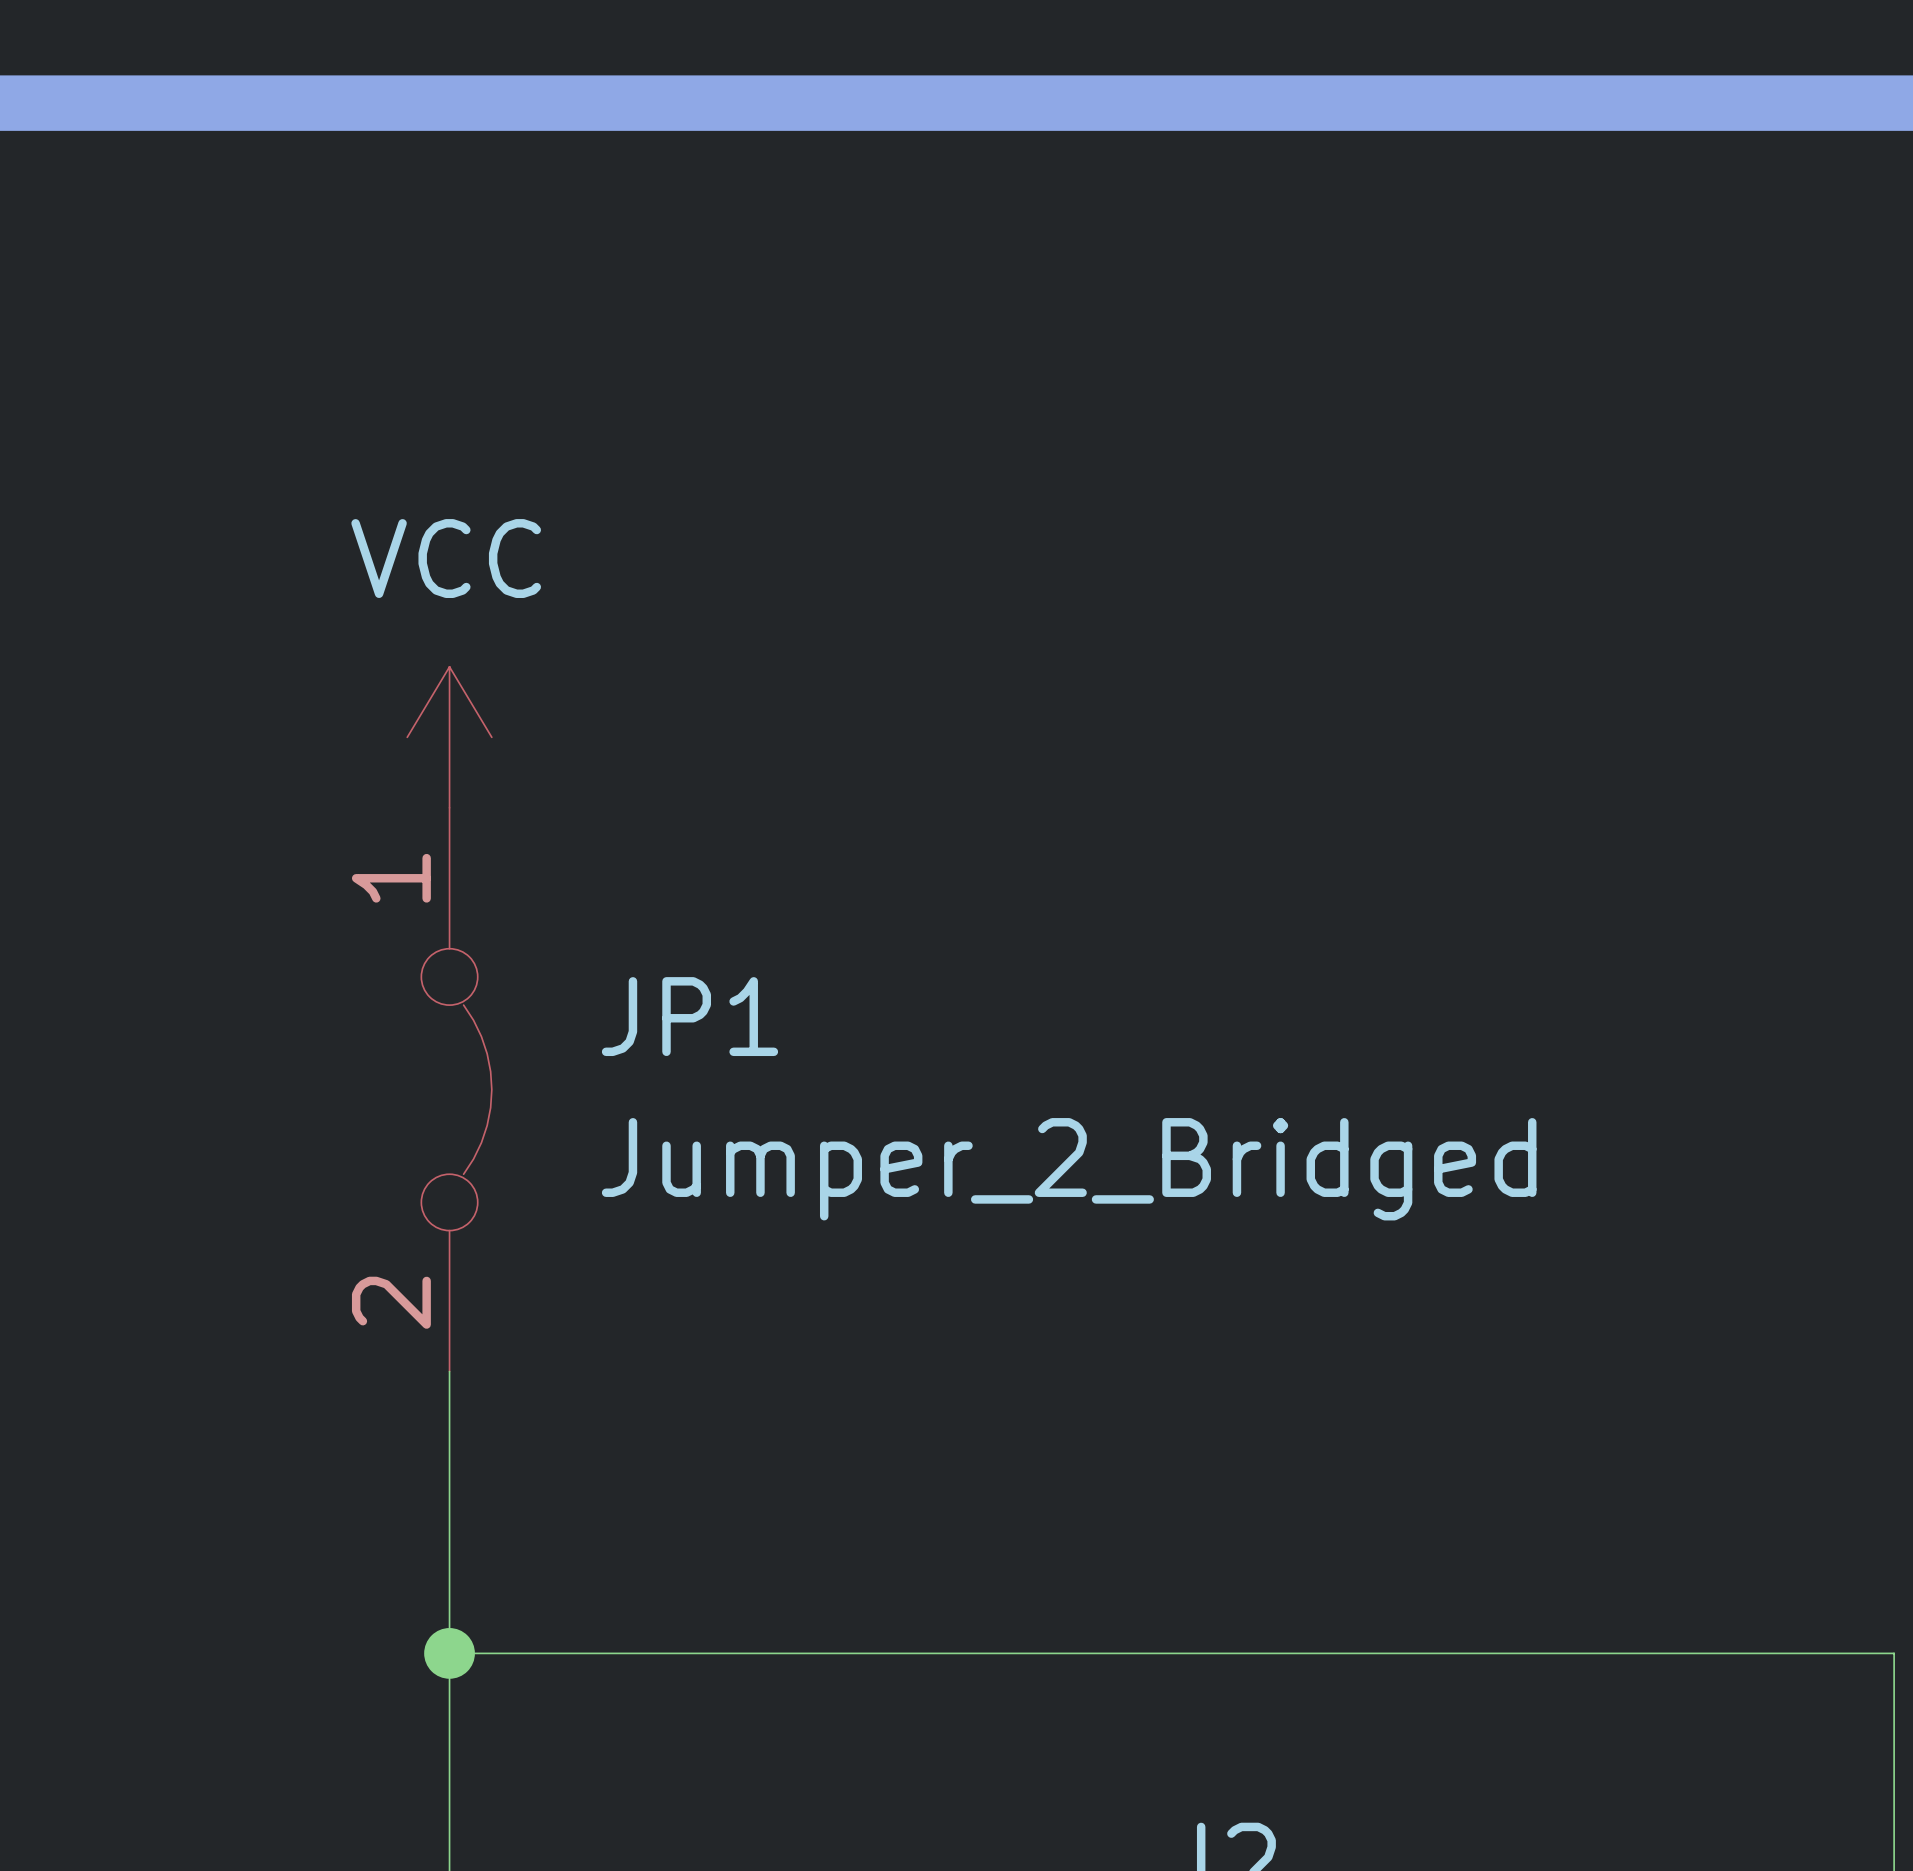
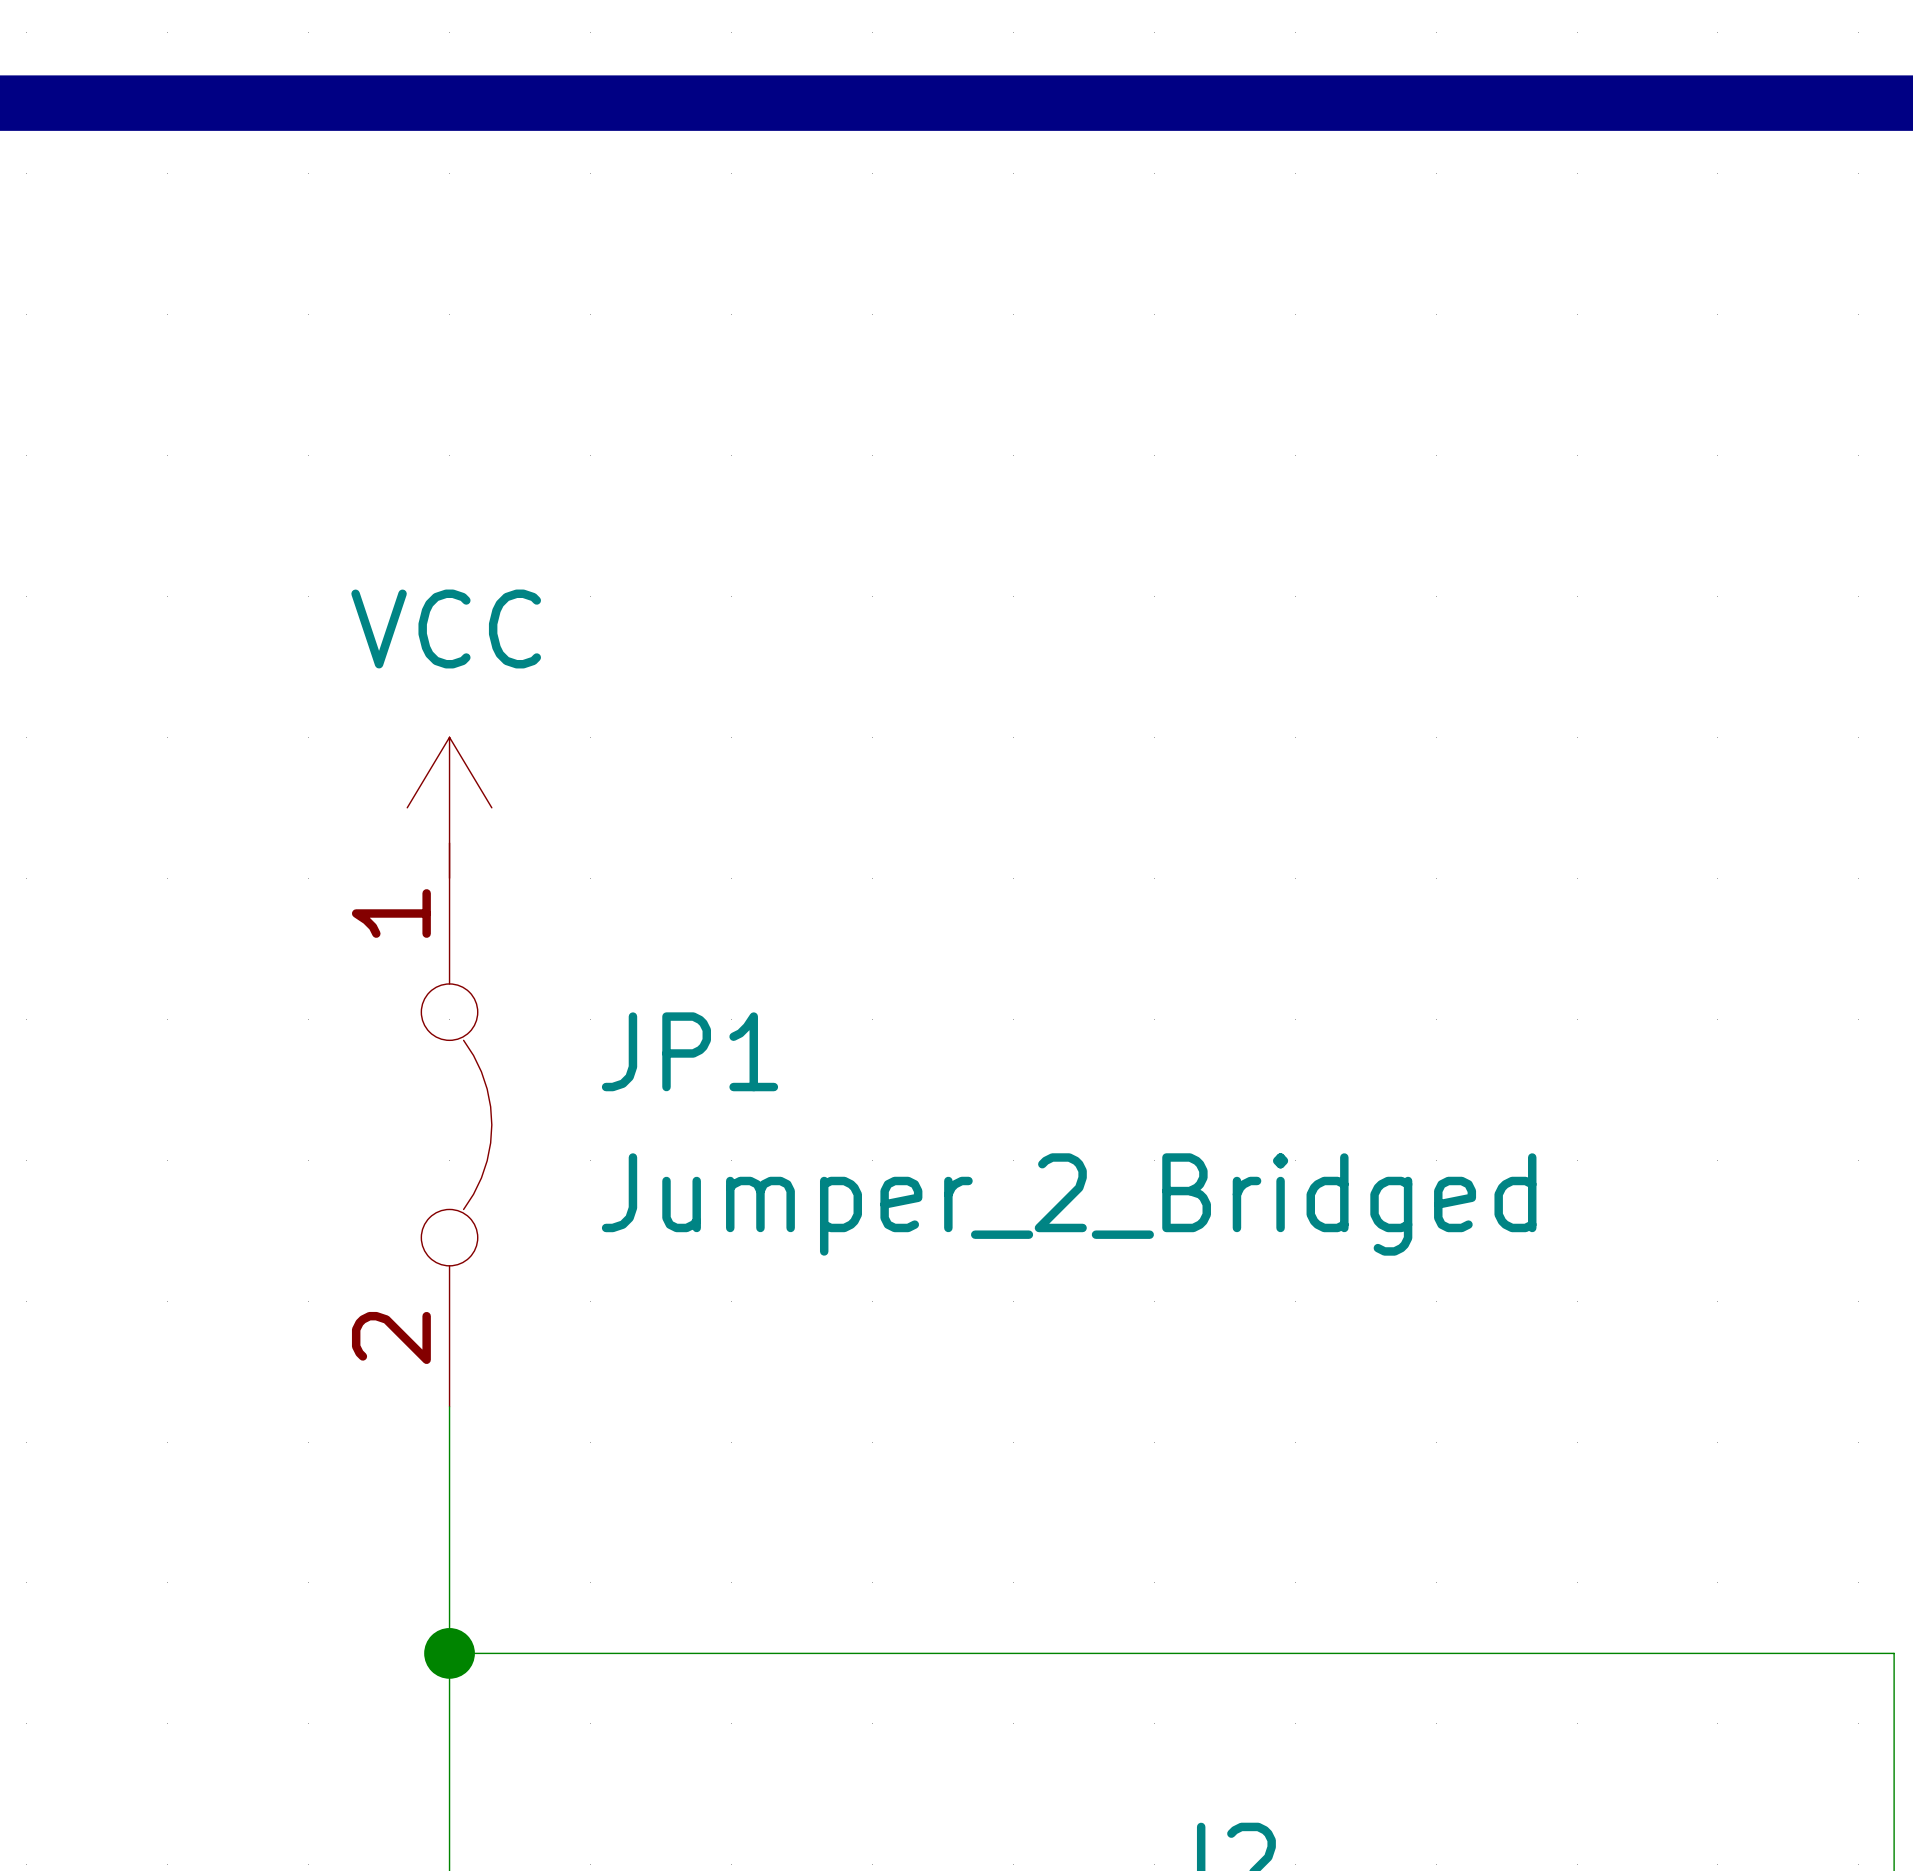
power symbol position: VCC (449, 737) -> VCC (449, 807)
JP1 position: (456, 1089) -> (456, 1124)

